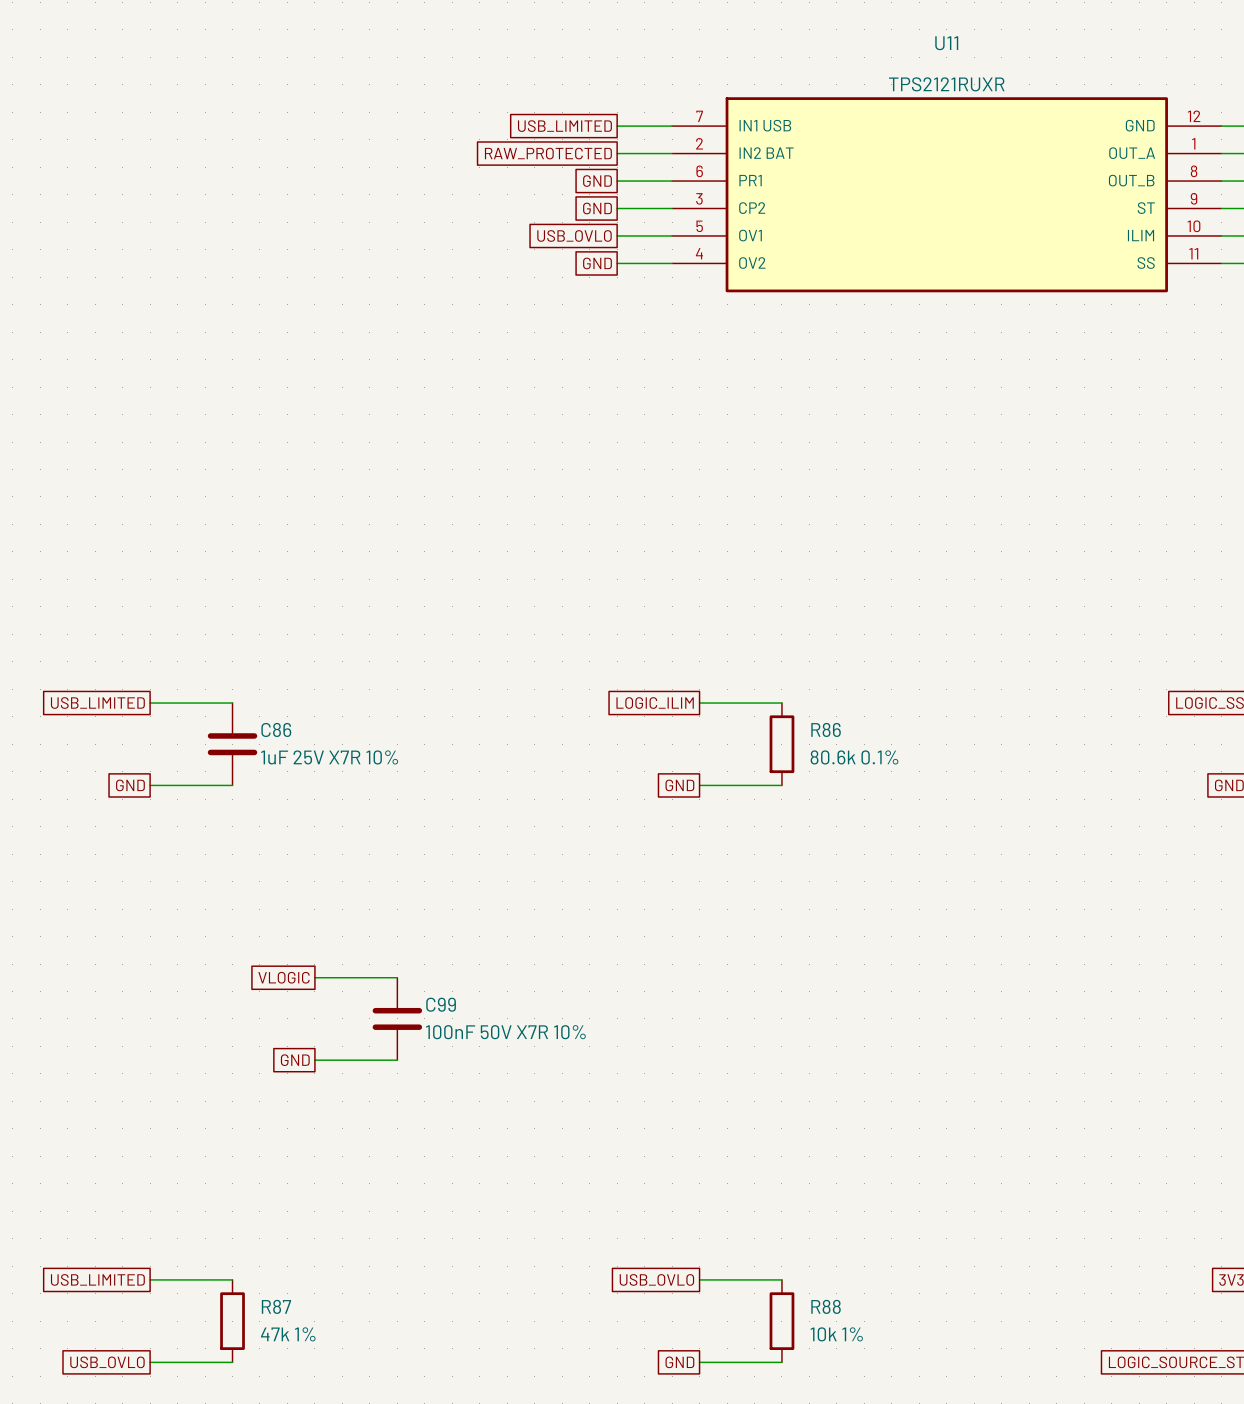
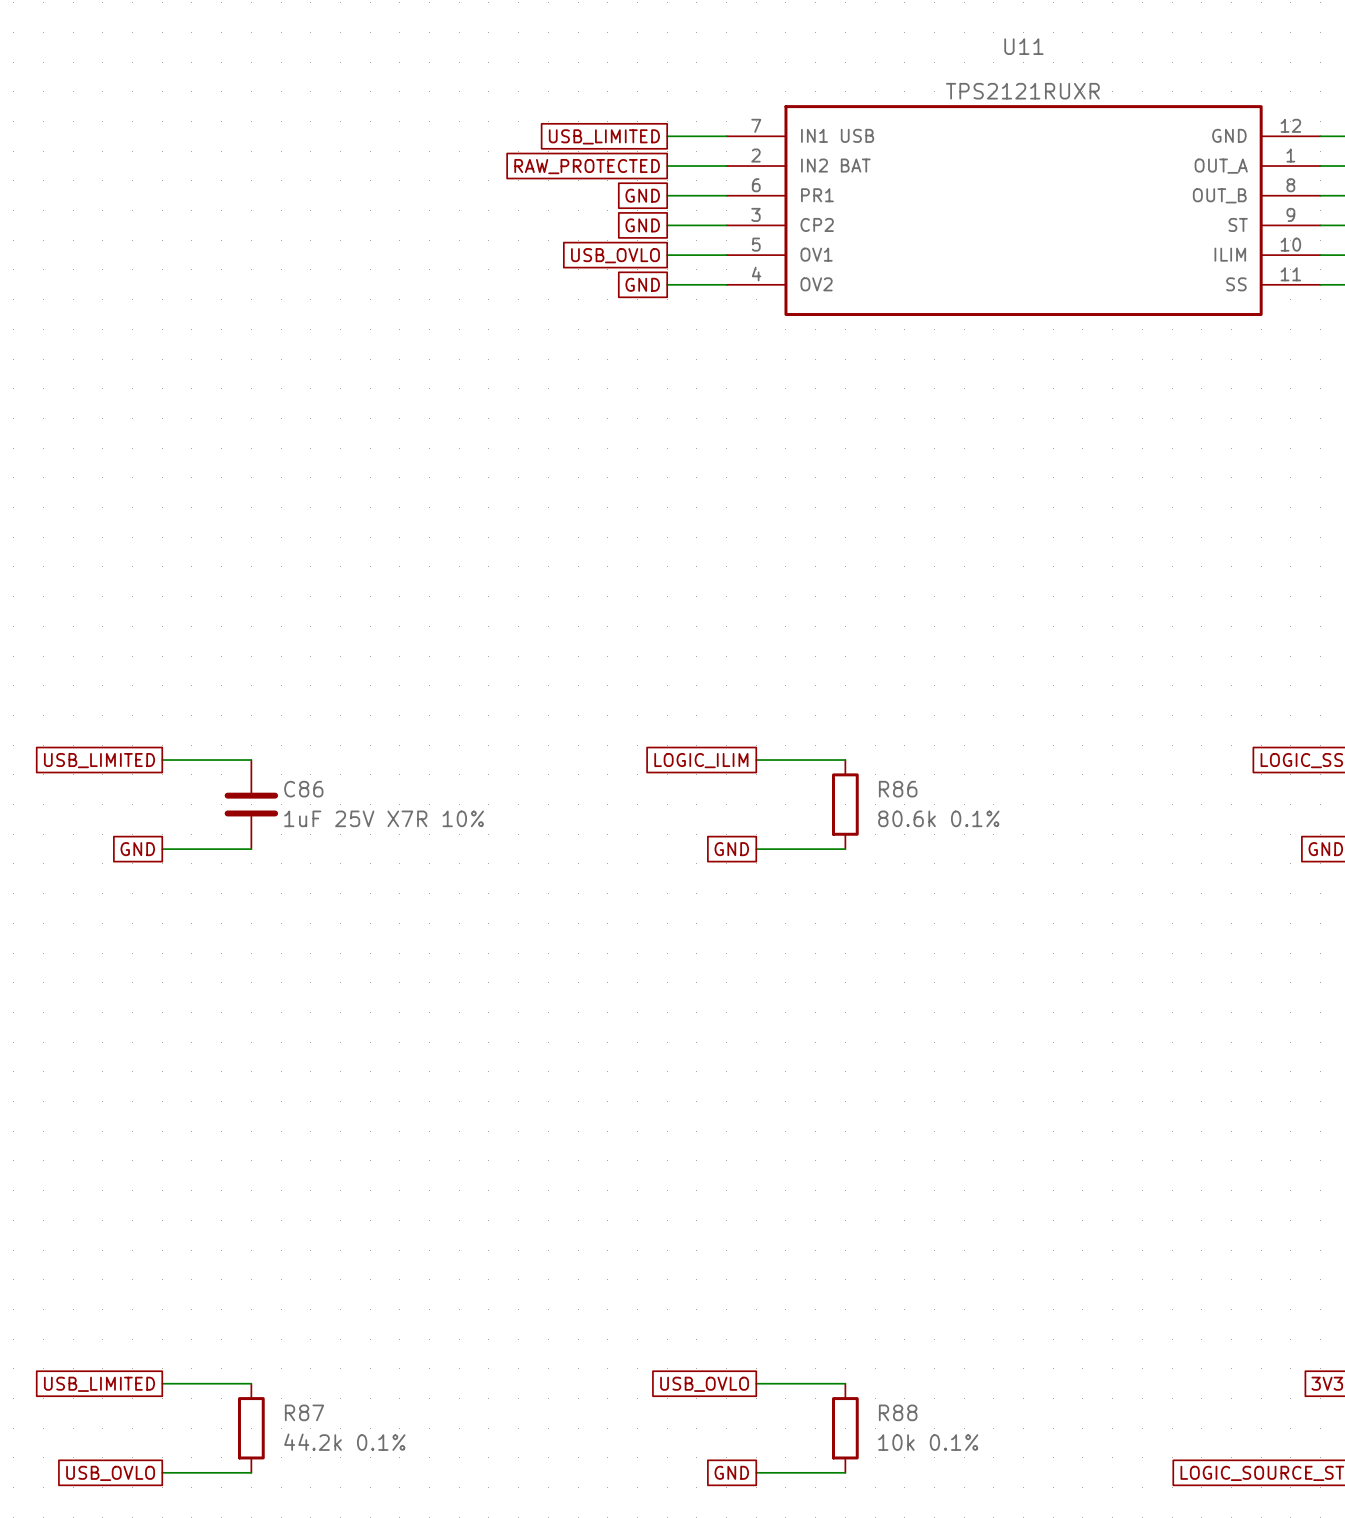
global label: VLOGIC (284, 977) -> none
wire: (314, 977) (397, 977) -> none
C99: 100nF 50V X7R 10% (397, 1018) -> none
global label: GND (295, 1060) -> none
wire: (314, 1060) (397, 1060) -> none
R87 value: 47k 1% (288, 1334) -> 44.2k 0.1% (344, 1442)
R88 value: 10k 1% (836, 1334) -> 10k 0.1% (928, 1442)

